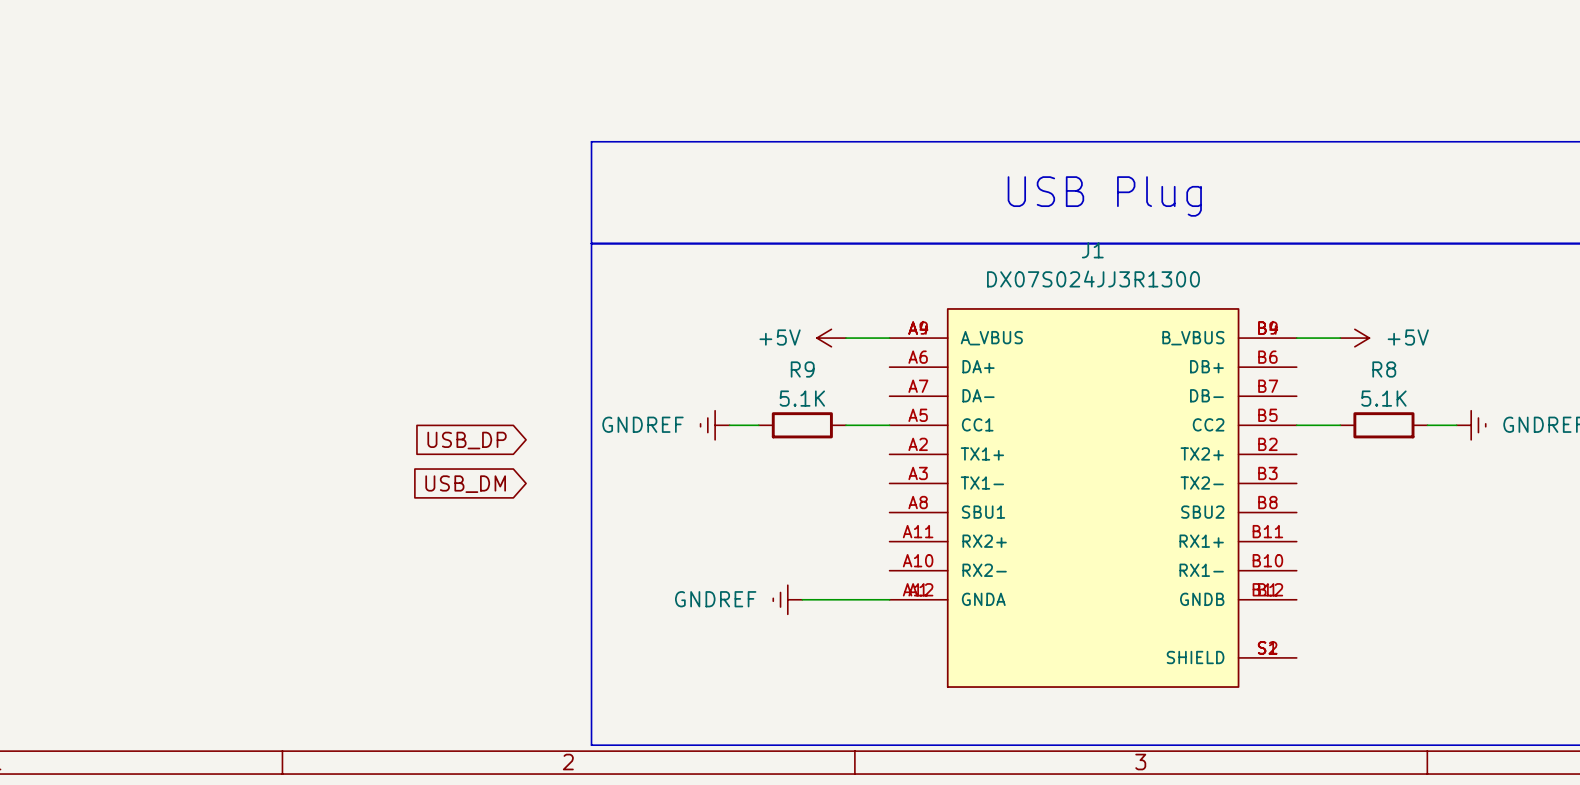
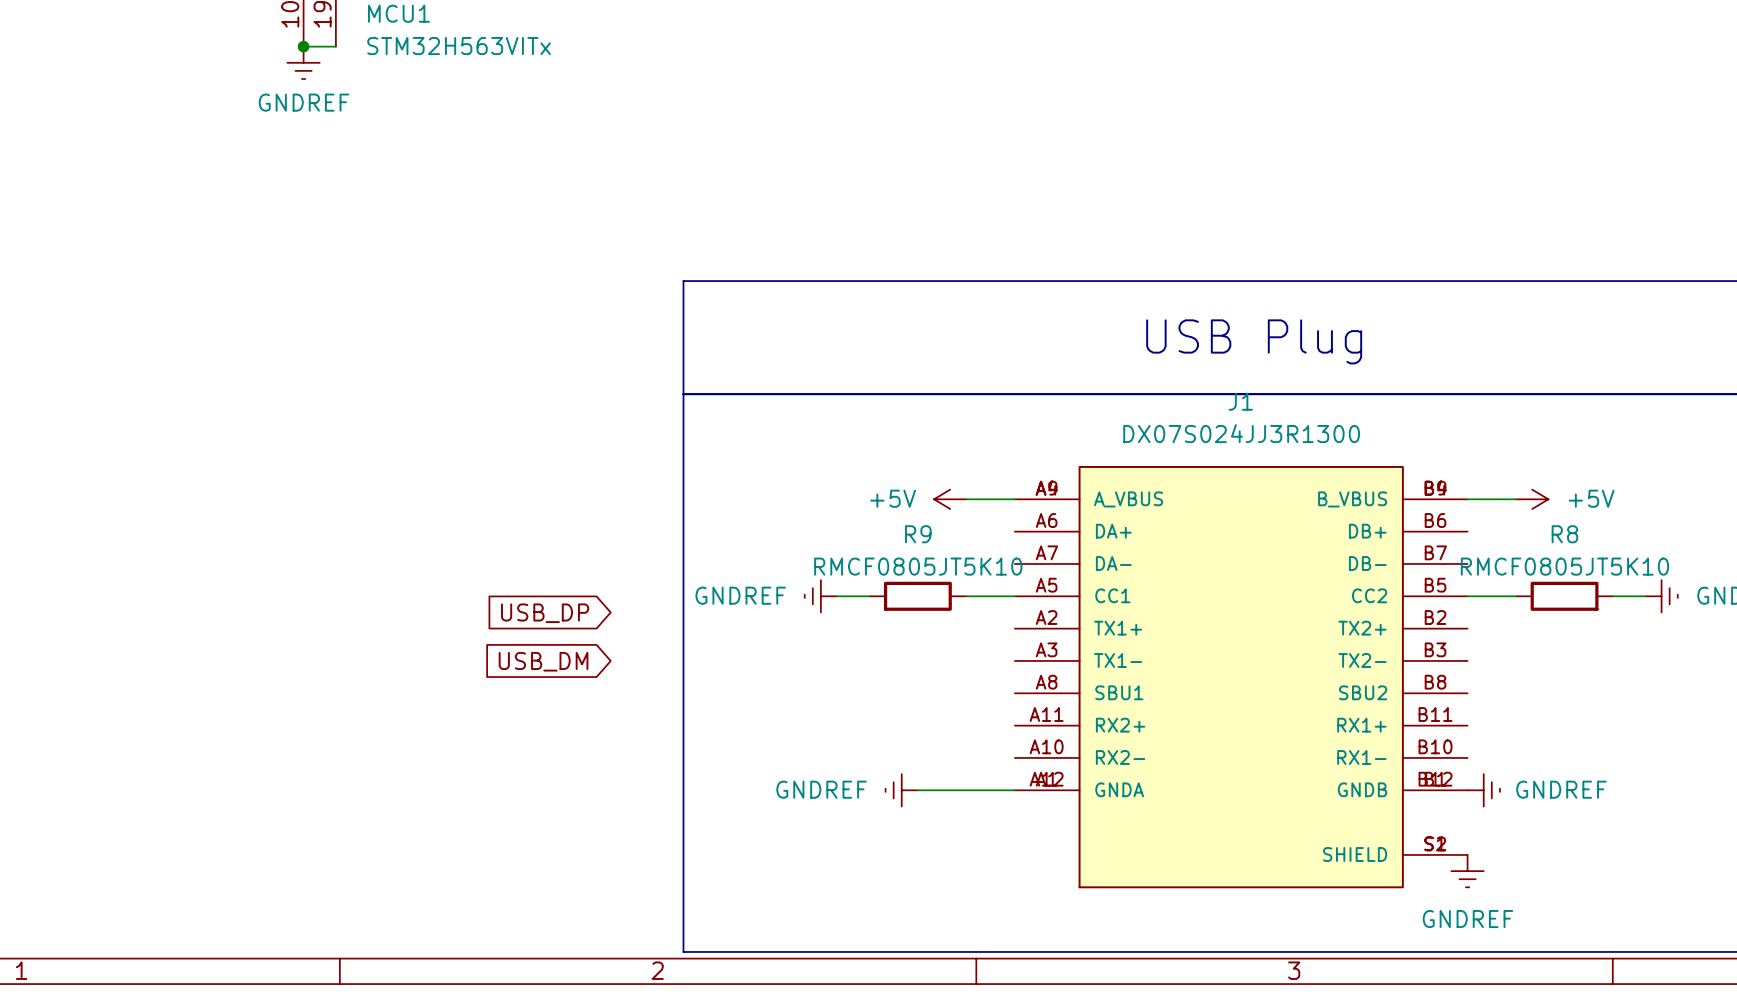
R9 value: 5.1K (802, 398) -> RMCF0805JT5K10 (918, 566)
R8 value: 5.1K (1383, 398) -> RMCF0805JT5K10 (1564, 566)
power symbol: none -> GNDREF (1483, 790)
power symbol: none -> GNDREF (1467, 871)

